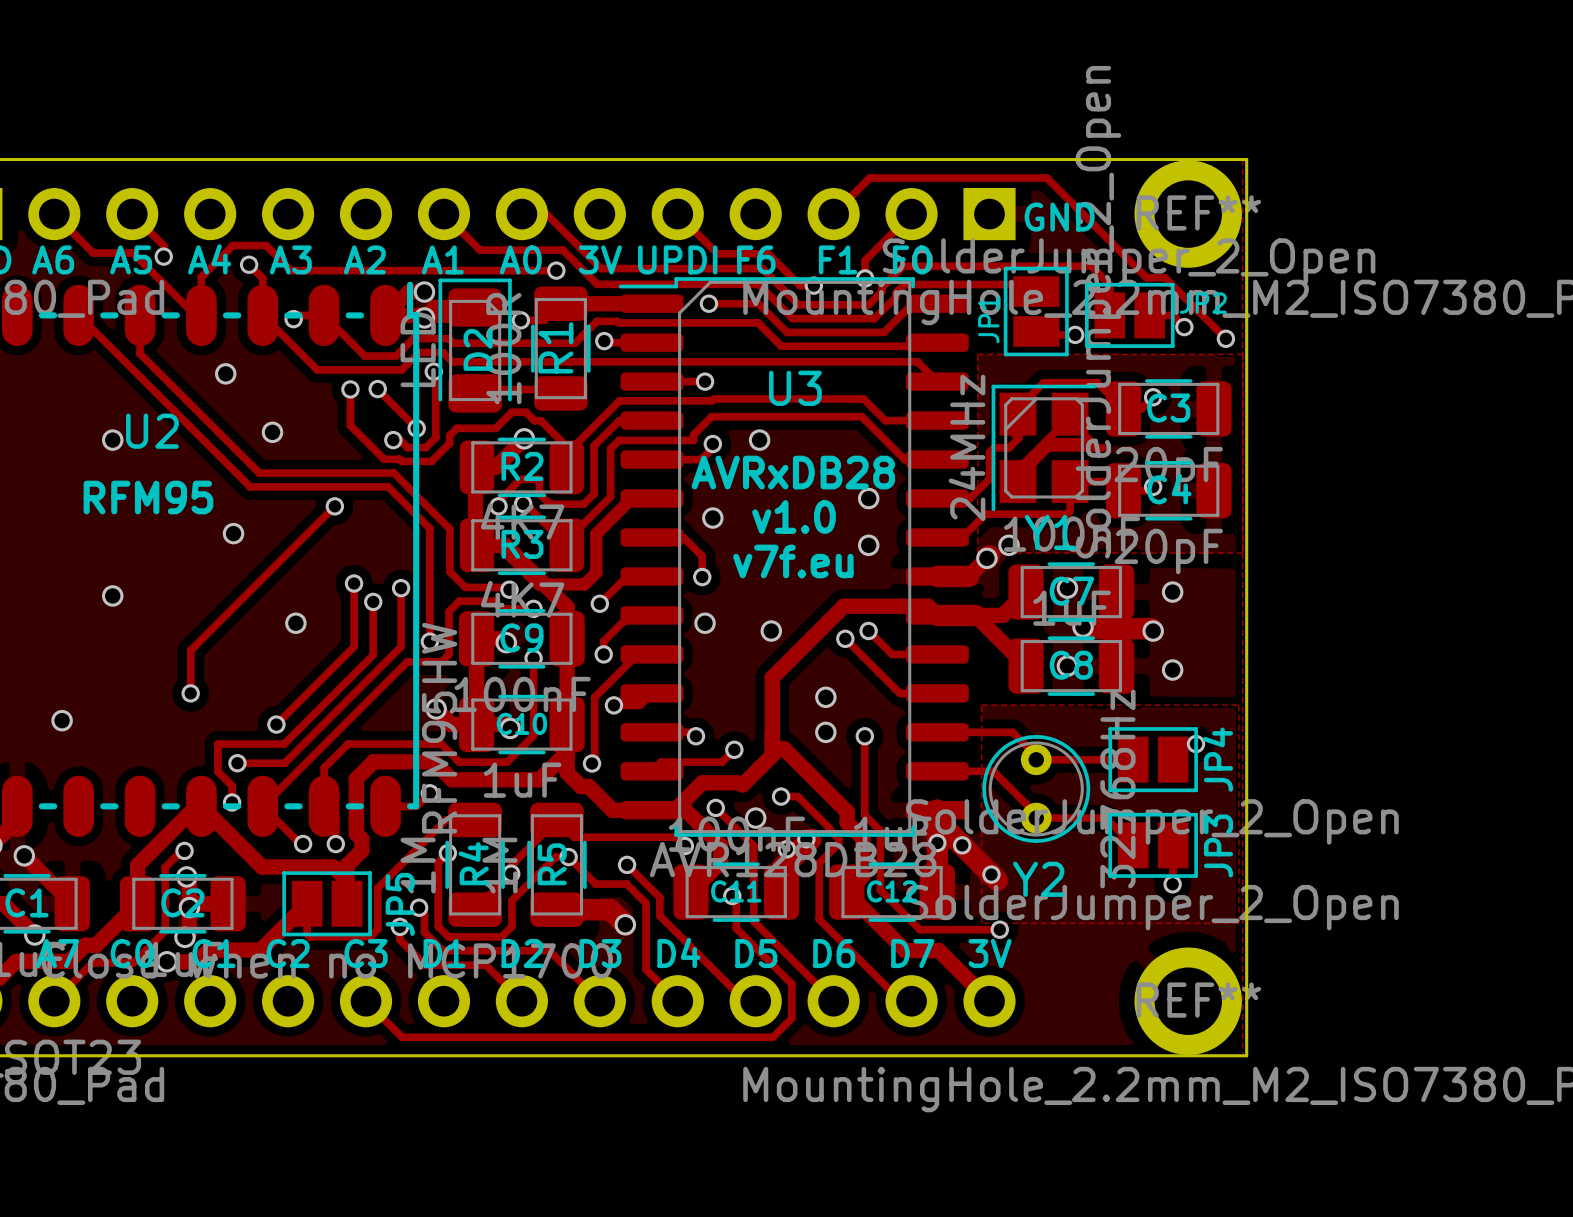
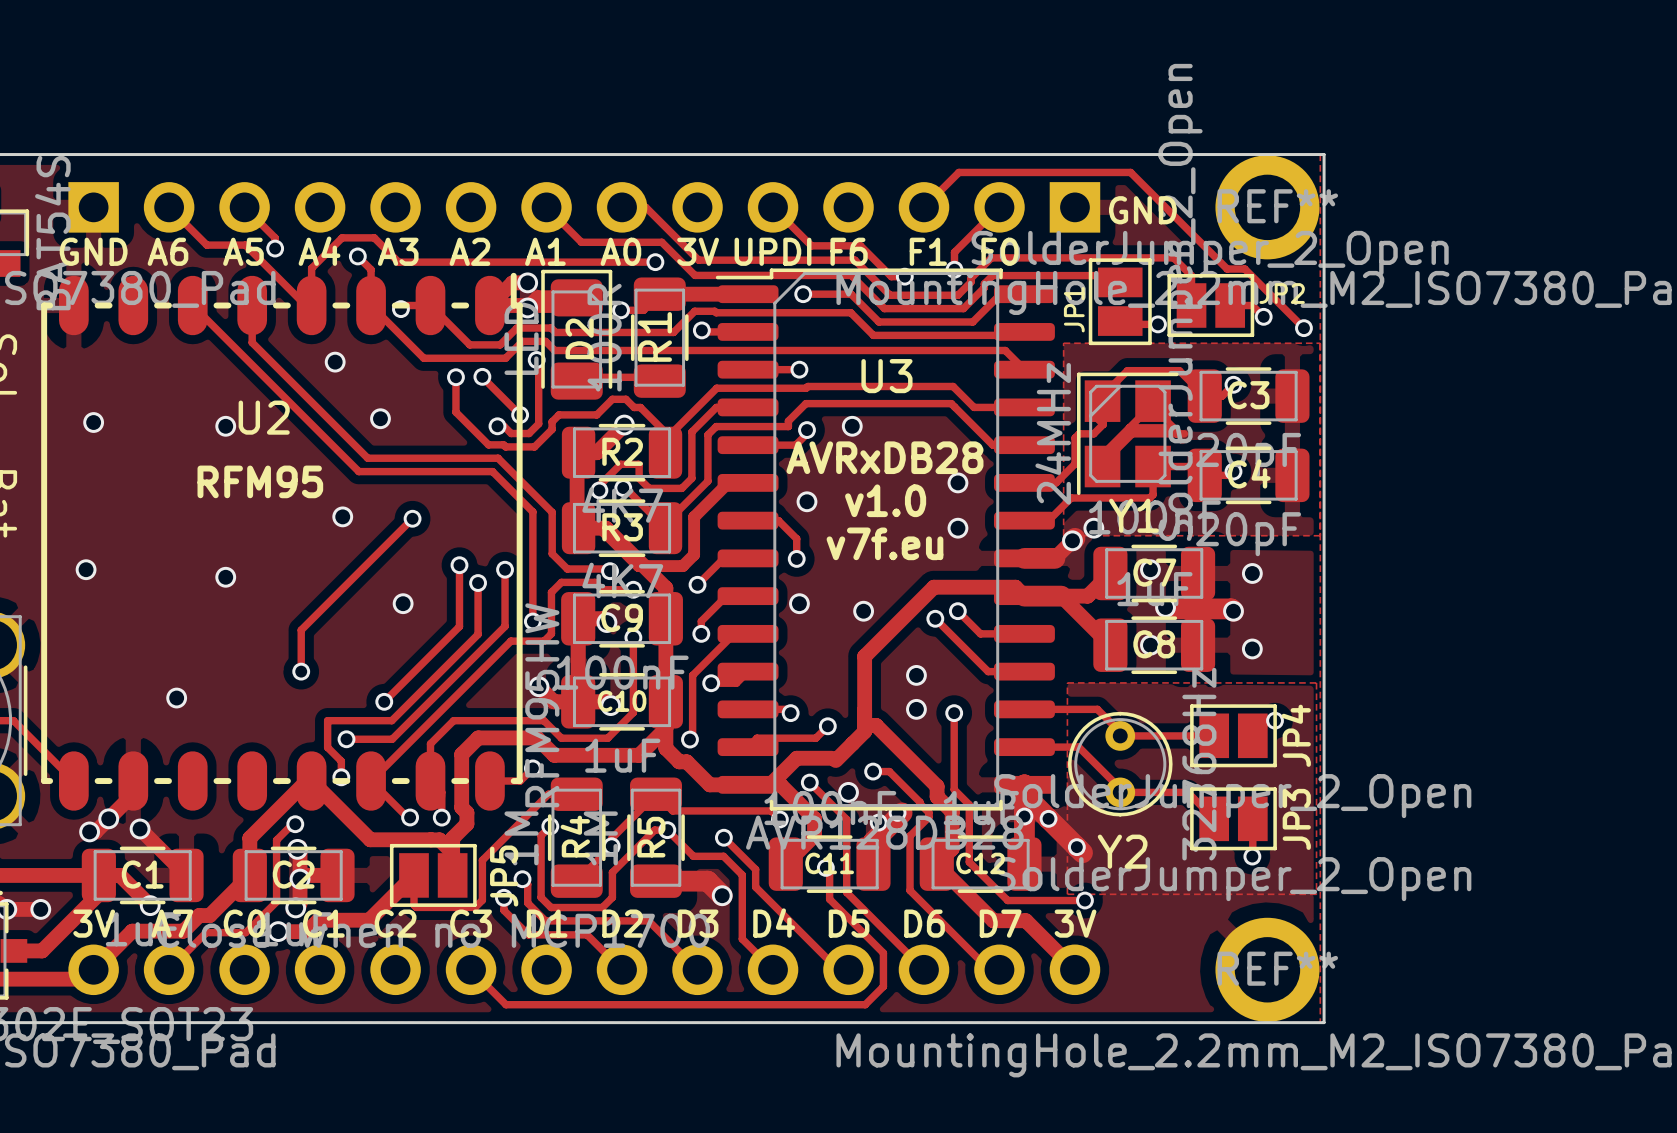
track: (334, 506) (305, 535) -> none
via position: (334, 506) -> (412, 518)

